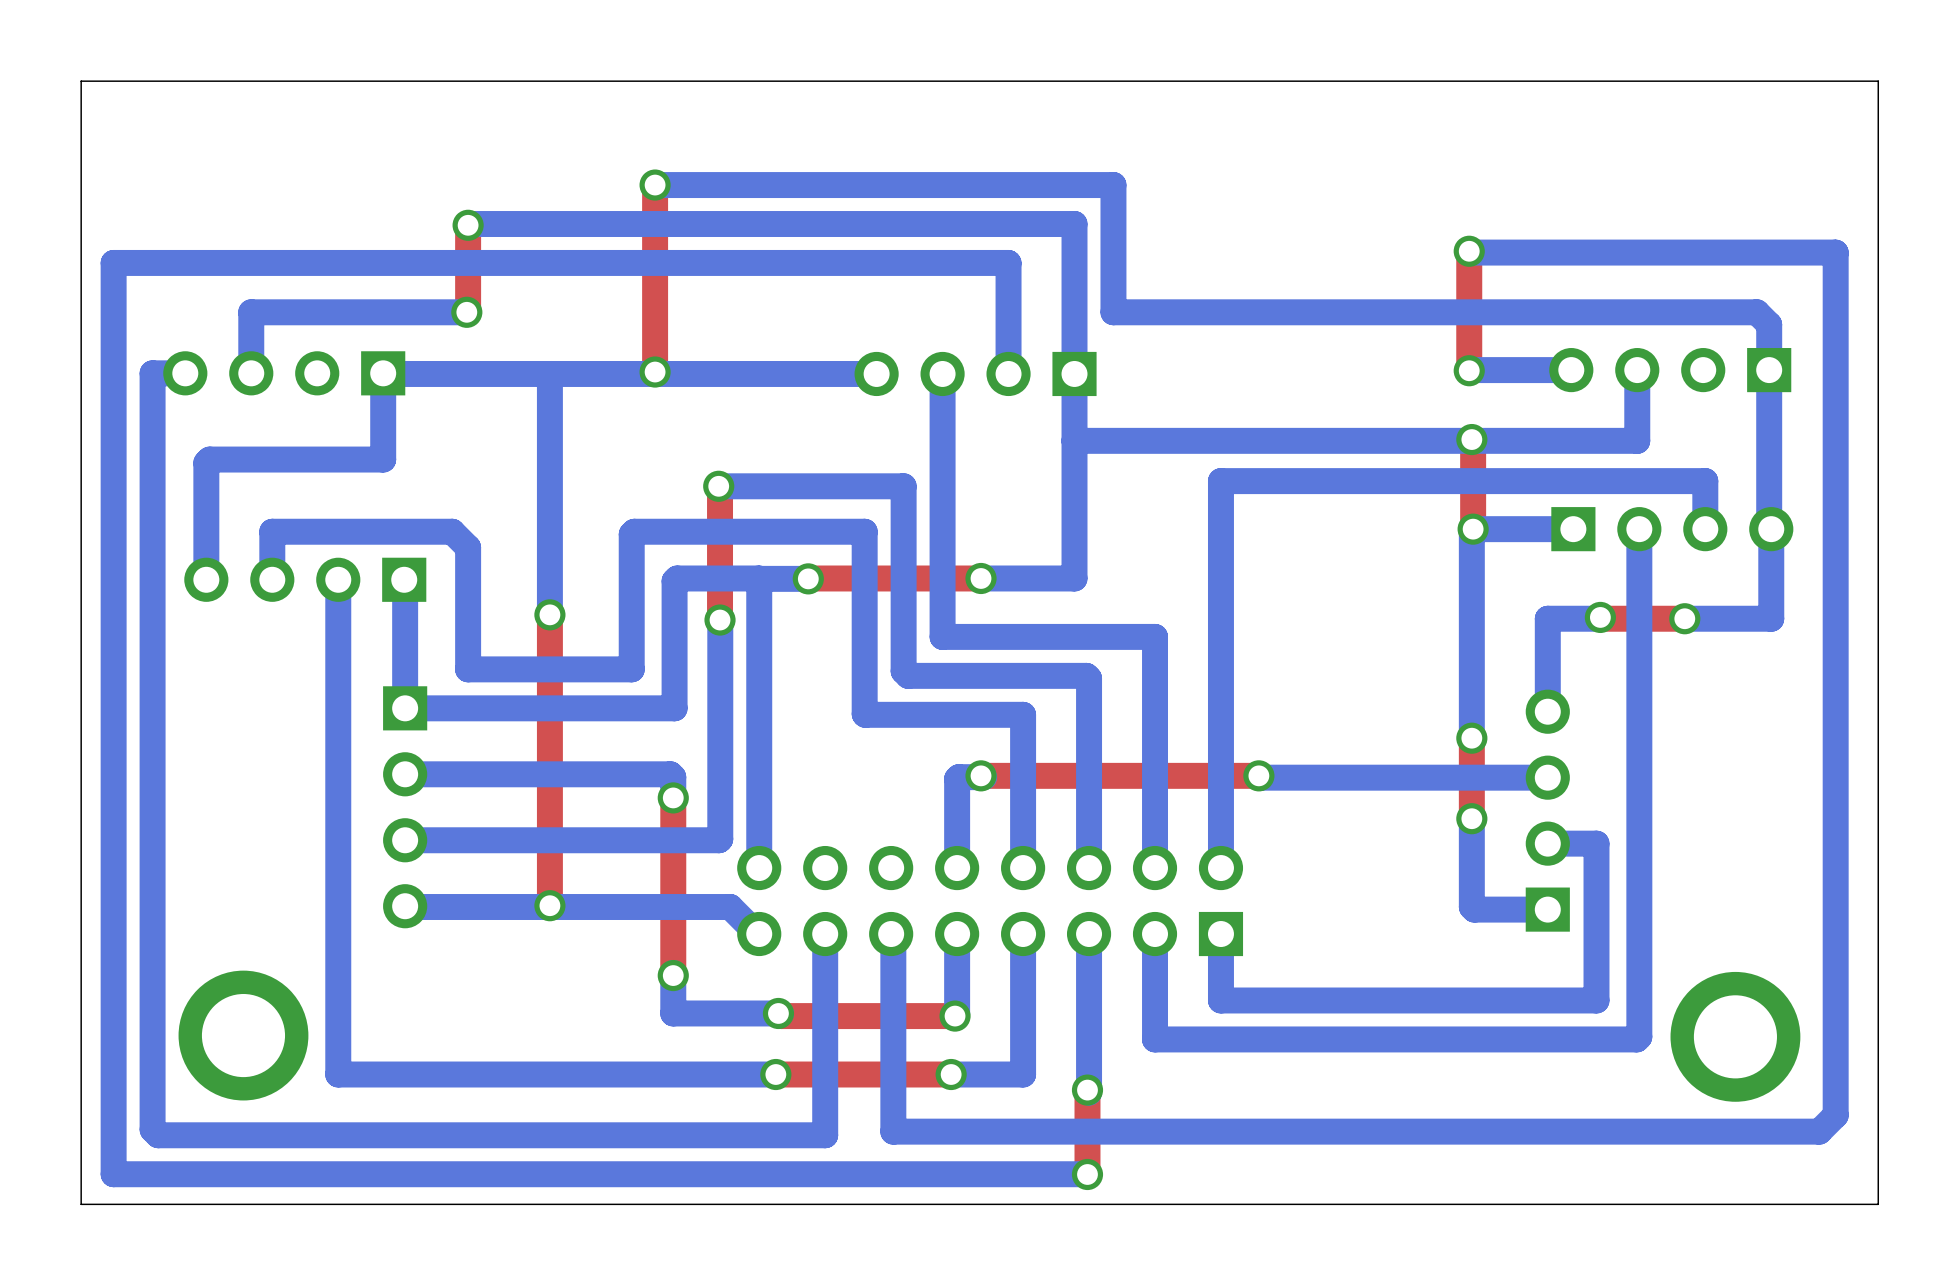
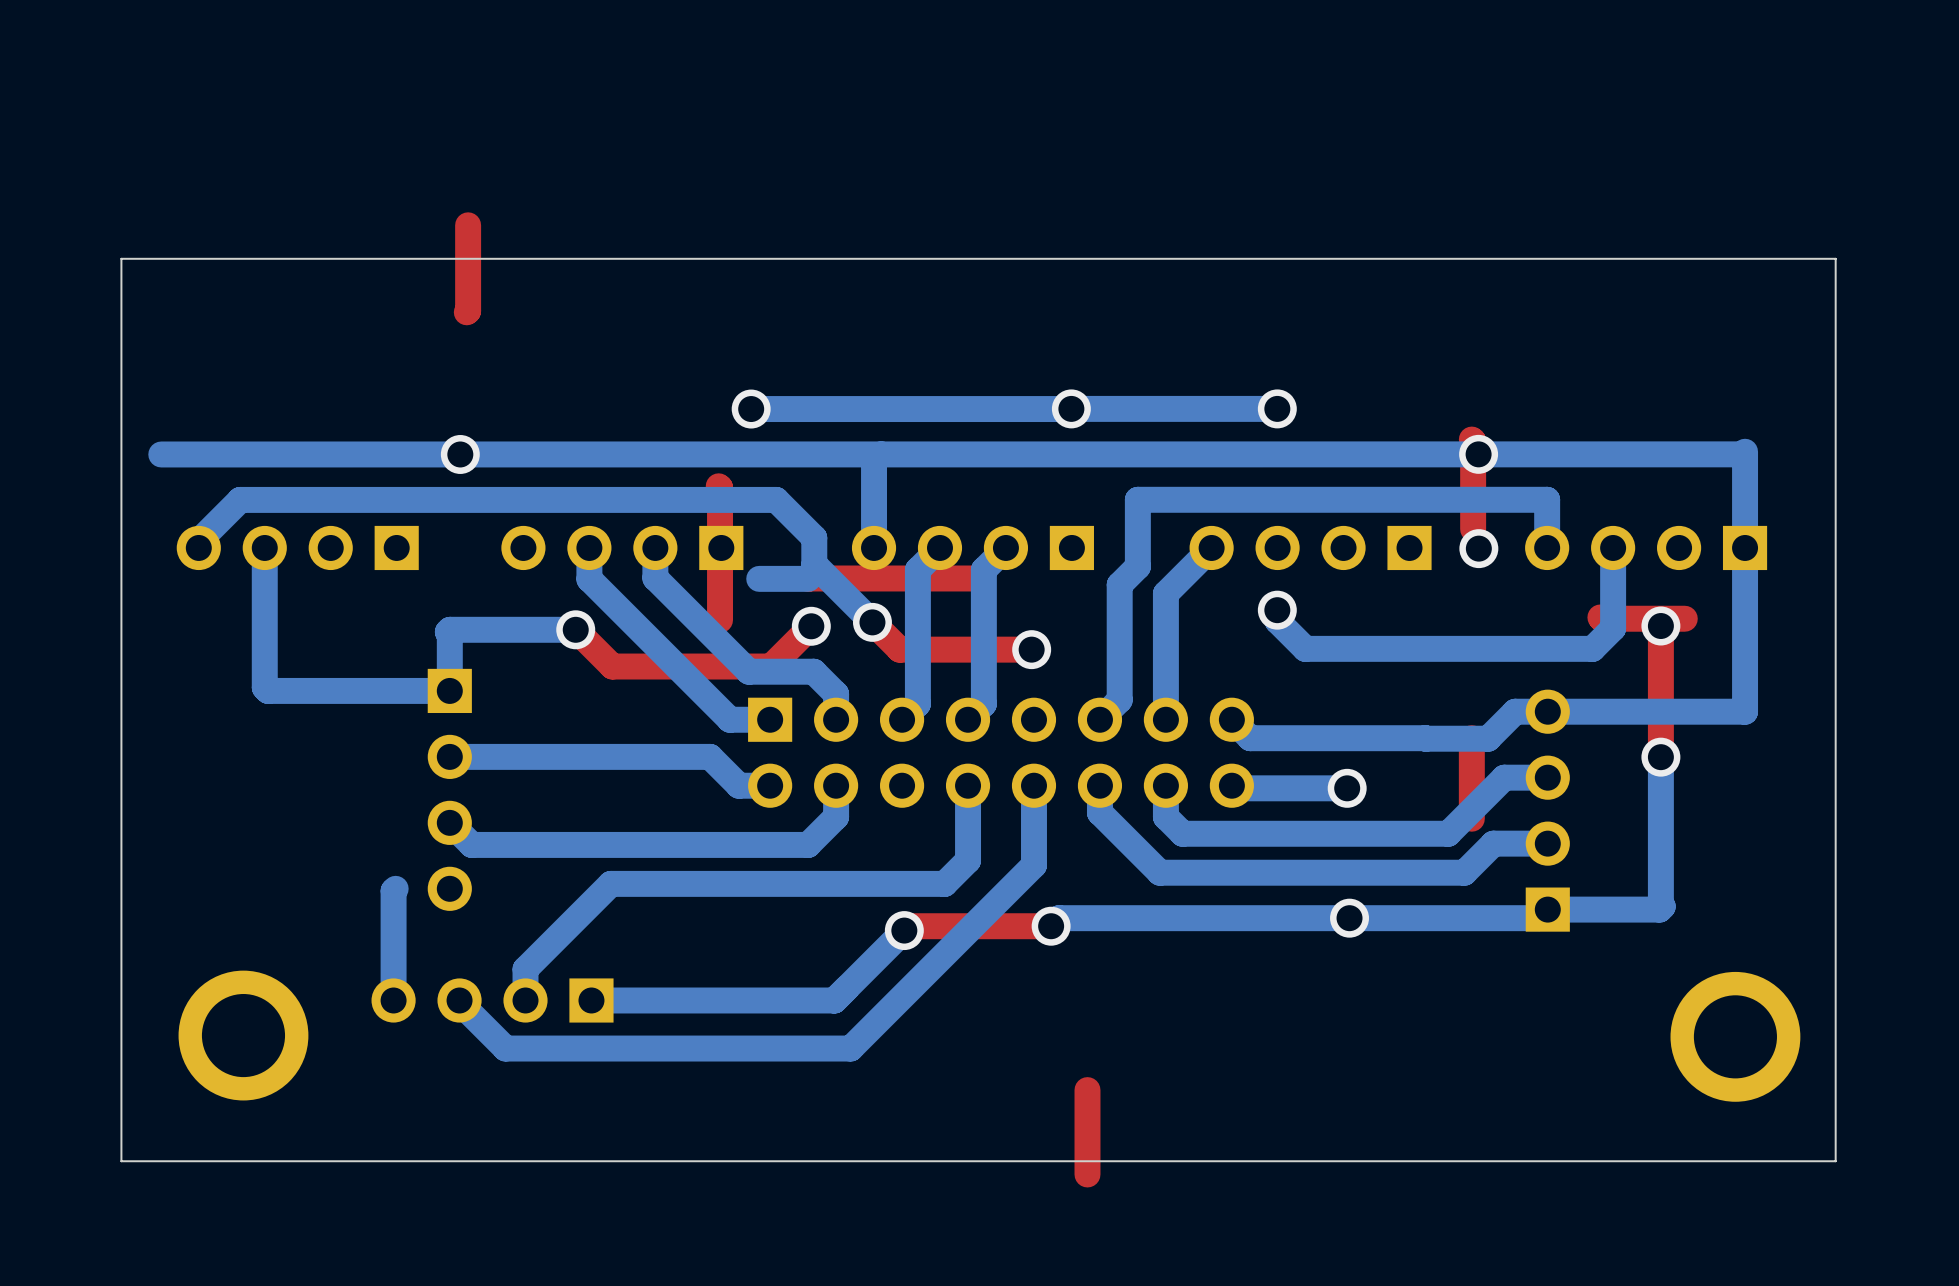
board edge: (1878, 81) (81, 81) (81, 1204) (1878, 1204) (1878, 81) -> (1835, 258) (1835, 1161) (121, 1161) (121, 258) (1835, 258)
bottom track: (653, 185) (1113, 185) (1113, 312) (1756, 312) (1769, 324) (1771, 618) (1684, 618) -> none
top track: (655, 185) (655, 372) -> none
via: (655, 185) -> none
bottom track: (468, 224) (1074, 224) (1074, 578) (981, 578) -> none
via: (468, 225) -> none
top track: (1469, 251) (1469, 370) -> none
via: (1469, 251) -> none
bottom track: (1835, 252) (1471, 252) -> none
bottom track: (1835, 252) (1835, 1115) (1819, 1131) (893, 1131) (893, 938) -> none
bottom track: (1008, 262) (113, 262) (113, 1174) (1088, 1173) -> none
bottom track: (1008, 263) (1008, 373) -> none
via: (466, 312) -> none
bottom track: (468, 312) (251, 312) (251, 375) -> none
via: (1469, 370) -> none
bottom track: (1571, 370) (1470, 370) -> none
bottom track: (1637, 370) (1637, 440) (1074, 440) -> none
part: (1670, 370) -> none
via: (655, 372) -> none
bottom track: (185, 373) (152, 373) (152, 1129) (158, 1135) (825, 1135) (825, 934) -> none
part: (284, 373) -> none
bottom track: (551, 373) (549, 614) -> none
bottom track: (876, 373) (383, 373) (383, 459) (209, 459) (206, 462) (206, 579) -> none
bottom track: (942, 373) (942, 636) (1155, 636) (1155, 868) -> none
part position: (975, 373) -> (972, 547)
via: none -> (1071, 408)
via: none -> (1277, 408)
via: none -> (751, 409)
via position: (1471, 439) -> (1478, 454)
bottom track: none -> (1745, 451) (1745, 711) (1515, 711) (1488, 738) (1250, 738) (1231, 719)
via: none -> (460, 454)
bottom track: none -> (881, 454) (874, 461) (874, 547)
bottom track: none -> (1741, 454) (161, 454)
bottom track: (718, 486) (903, 486) (903, 671) (908, 675) (1086, 675) (1089, 678) (1089, 868) -> none
via: (718, 486) -> none
via position: (1473, 529) -> (1478, 548)
bottom track: (1573, 529) (1471, 529) (1471, 738) -> none
bottom track: (1639, 529) (1639, 1036) (1636, 1039) (1155, 1039) (1155, 934) -> none
part rotation: 0° (1672, 529) -> 180° (1646, 547)
bottom track: (1705, 529) (1705, 481) (1220, 481) (1220, 868) -> none
bottom track: none -> (198, 547) (198, 541) (240, 499) (776, 499) (814, 537) (814, 564) (872, 622)
bottom track: none -> (264, 547) (264, 687) (268, 690) (449, 690) (449, 633) (447, 631) (450, 629) (575, 629)
bottom track: none -> (589, 547) (589, 579) (729, 719) (770, 719)
part: none -> (622, 547)
bottom track: none -> (655, 547) (655, 578) (748, 671) (813, 671) (836, 694) (836, 719)
bottom track: none -> (939, 547) (917, 570) (917, 703) (902, 719)
bottom track: none -> (1005, 547) (983, 570) (983, 703) (968, 719)
bottom track: none -> (1211, 547) (1165, 593) (1165, 719)
part: none -> (1310, 547)
bottom track: none -> (1547, 547) (1547, 499) (1137, 499) (1137, 566) (1119, 584) (1119, 700) (1099, 719)
bottom track: none -> (1613, 547) (1613, 628) (1592, 648) (1305, 648) (1277, 621) (1277, 610)
via: (808, 578) -> none
via: (981, 578) -> none
bottom track: (272, 579) (272, 531) (452, 531) (468, 547) (468, 669) (631, 669) (631, 534) (634, 531) (864, 531) (864, 714) (1023, 714) (1023, 868) -> none
part position: (305, 579) -> (297, 547)
bottom track: (338, 579) (338, 1074) (775, 1074) -> none
bottom track: (404, 579) (405, 708) (674, 708) (674, 581) (677, 578) (758, 578) (759, 868) -> none
via: none -> (1277, 610)
top track: (549, 614) (549, 905) -> none
via: (549, 614) -> none
via: (1600, 617) -> none
bottom track: (720, 618) (719, 840) (405, 840) -> none
bottom track: (1600, 618) (1547, 618) (1547, 711) -> none
via position: (1684, 618) -> (1660, 626)
via: (720, 620) -> none
top track: none -> (872, 622) (899, 649) (1031, 649)
via: none -> (872, 622)
top track: none -> (811, 626) (771, 666) (612, 666) (575, 629)
via: none -> (811, 626)
top track: none -> (1660, 626) (1660, 757)
via: none -> (575, 629)
via: none -> (1031, 649)
via: (1471, 738) -> none
bottom track: none -> (449, 756) (710, 756) (738, 785) (770, 785)
bottom track: none -> (1660, 757) (1660, 904) (1662, 906) (1659, 909) (1547, 909) (1539, 918) (1059, 918) (1051, 926)
via: none -> (1660, 757)
bottom track: (405, 774) (670, 774) (673, 777) (673, 797) -> none
via: (981, 775) -> none
top track: (1258, 775) (981, 775) -> none
via: (1258, 775) -> none
bottom track: (984, 777) (958, 777) (957, 778) (957, 868) -> none
bottom track: (1259, 777) (1504, 777) -> (1165, 785) (1165, 816) (1182, 833) (1448, 833) (1504, 777)
bottom track: none -> (836, 785) (836, 816) (808, 844) (471, 844) (449, 822)
bottom track: none -> (968, 785) (968, 860) (944, 883) (610, 883) (525, 969) (525, 1000)
bottom track: none -> (1033, 785) (1033, 865) (850, 1048) (505, 1048) (459, 1000)
bottom track: none -> (1231, 785) (1234, 788) (1347, 788)
via: none -> (1347, 788)
top track: (673, 797) (673, 975) -> none
via: (673, 797) -> none
part position: (405, 807) -> (449, 789)
bottom track: (1471, 816) (1471, 907) (1474, 909) (1547, 909) -> none
via: (1471, 818) -> none
bottom track: (1547, 843) (1596, 843) (1596, 1000) (1220, 1000) (1220, 934) -> (1547, 843) (1493, 843) (1464, 872) (1159, 872) (1099, 812) (1099, 785)
bottom track: none -> (395, 888) (393, 890) (393, 1000)
part rotation: 0° (990, 901) -> 180° (1001, 752)
via: (549, 905) -> none
bottom track: (405, 906) (730, 907) (759, 934) -> none
via: none -> (1349, 918)
top track: none -> (1051, 926) (908, 926) (904, 930)
via: none -> (1051, 926)
bottom track: none -> (904, 930) (834, 1000) (591, 1000)
via: none -> (904, 930)
bottom track: (957, 934) (957, 1014) (955, 1016) -> none
bottom track: (1023, 934) (1023, 1074) (949, 1074) -> none
bottom track: (1089, 934) (1089, 1092) -> none
bottom track: (673, 972) (673, 1013) (781, 1013) -> none
via: (673, 975) -> none
part: none -> (492, 1000)
top track: (778, 1013) (781, 1016) (955, 1016) -> none
via: (778, 1013) -> none
via: (955, 1016) -> none
via: (775, 1074) -> none
top track: (951, 1074) (775, 1074) -> none
via: (951, 1074) -> none
via: (1087, 1090) -> none
via: (1087, 1174) -> none

